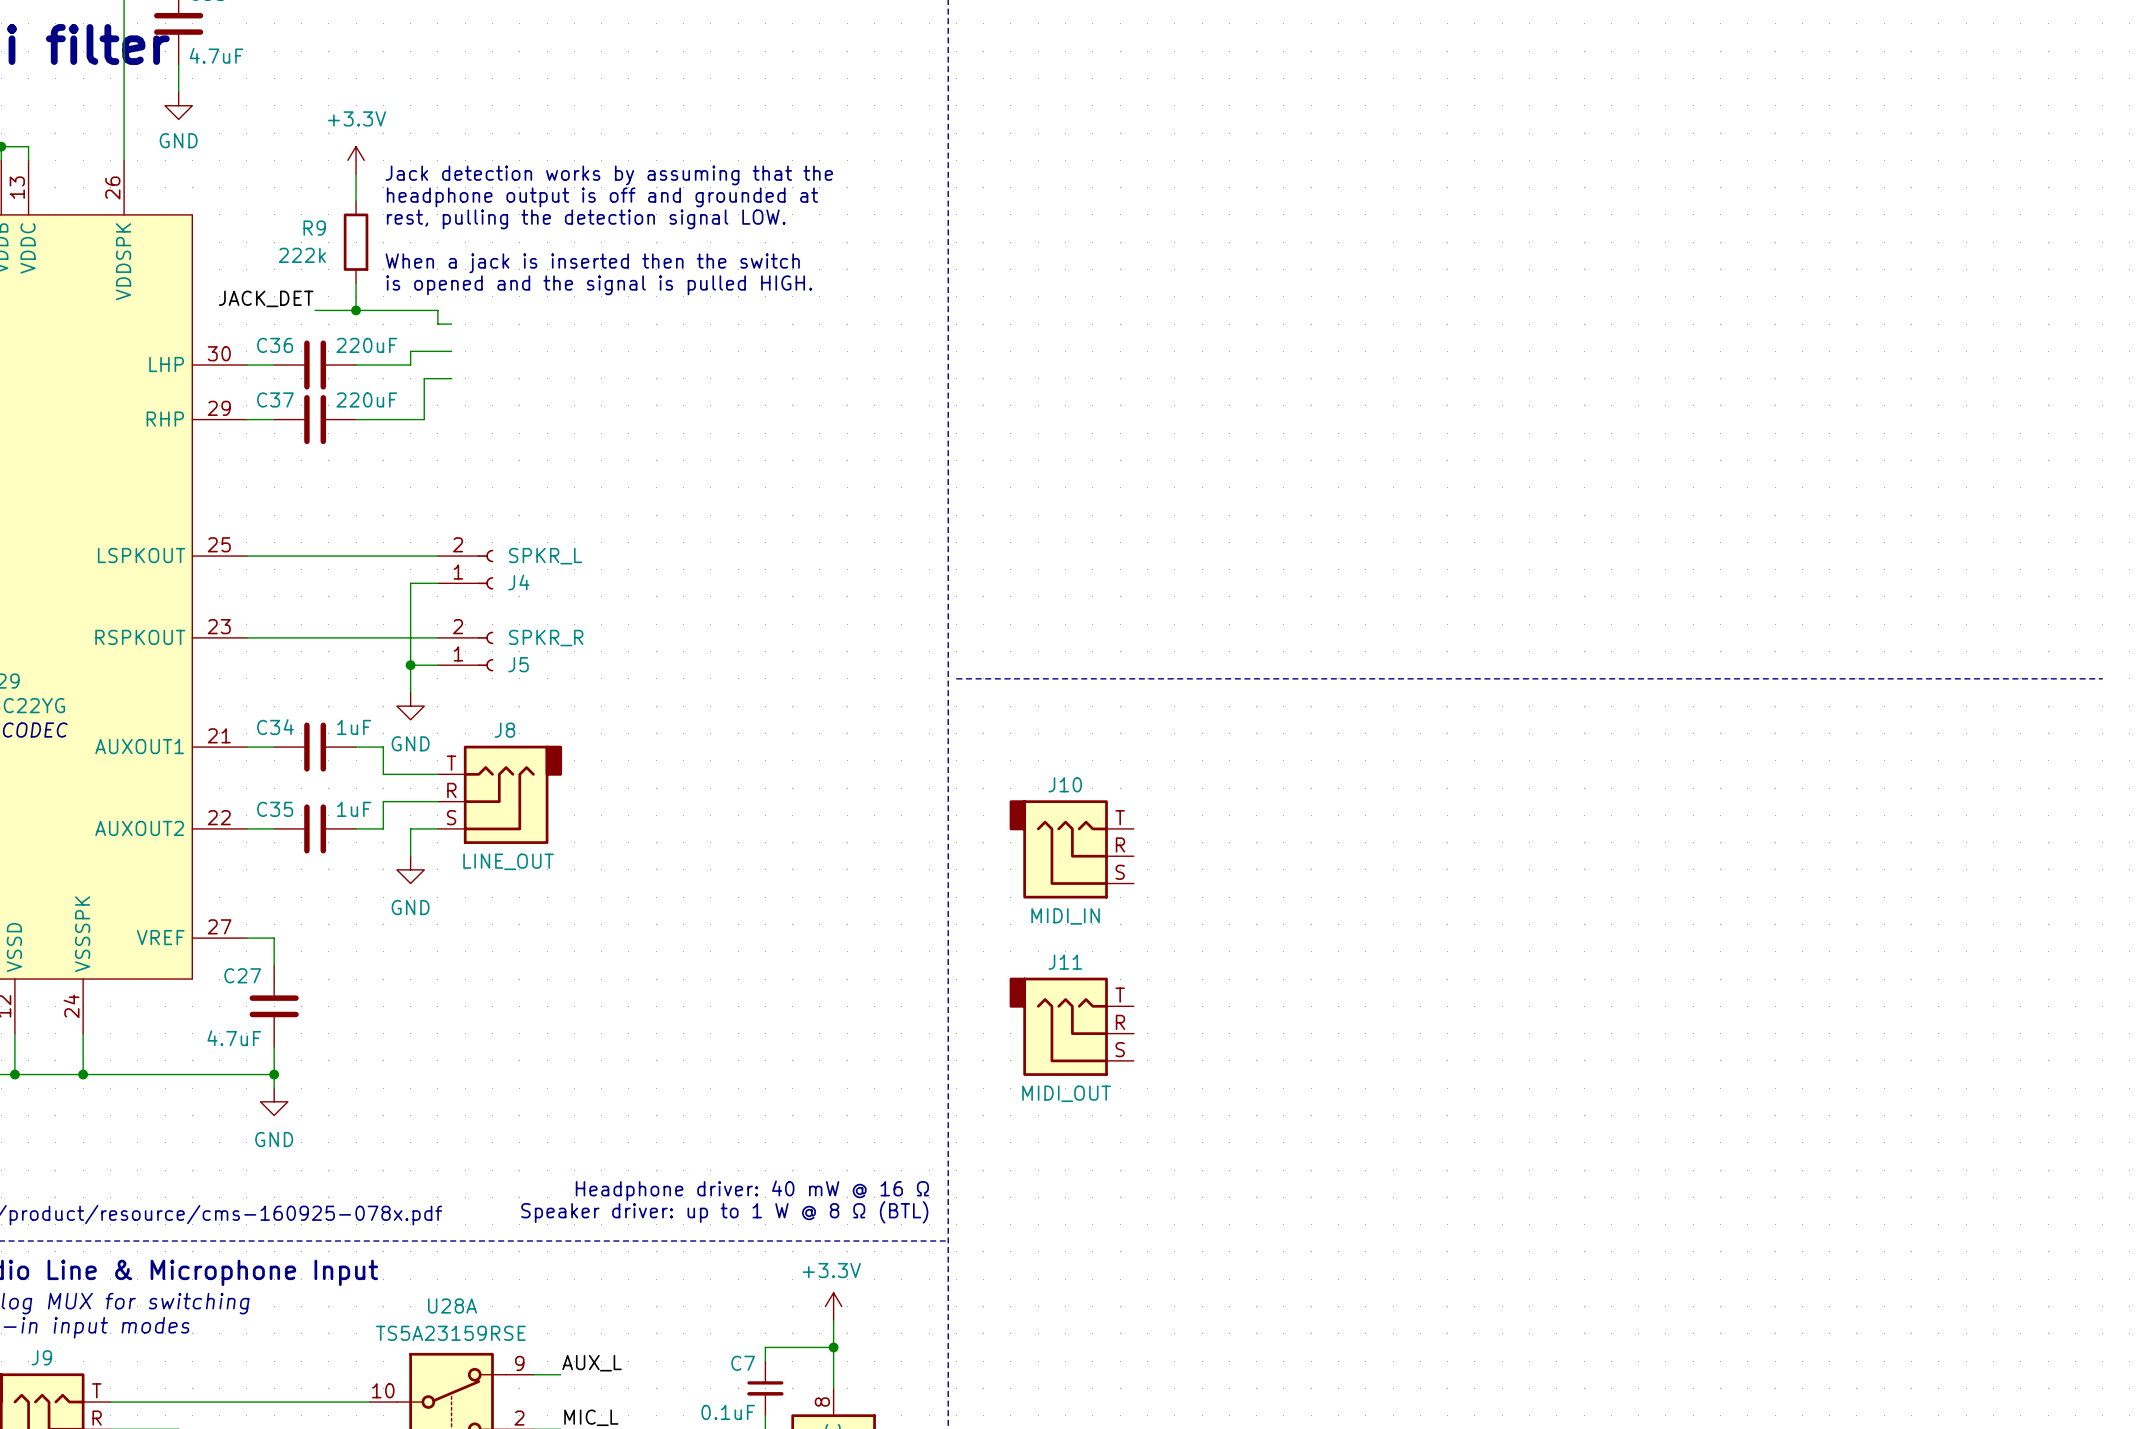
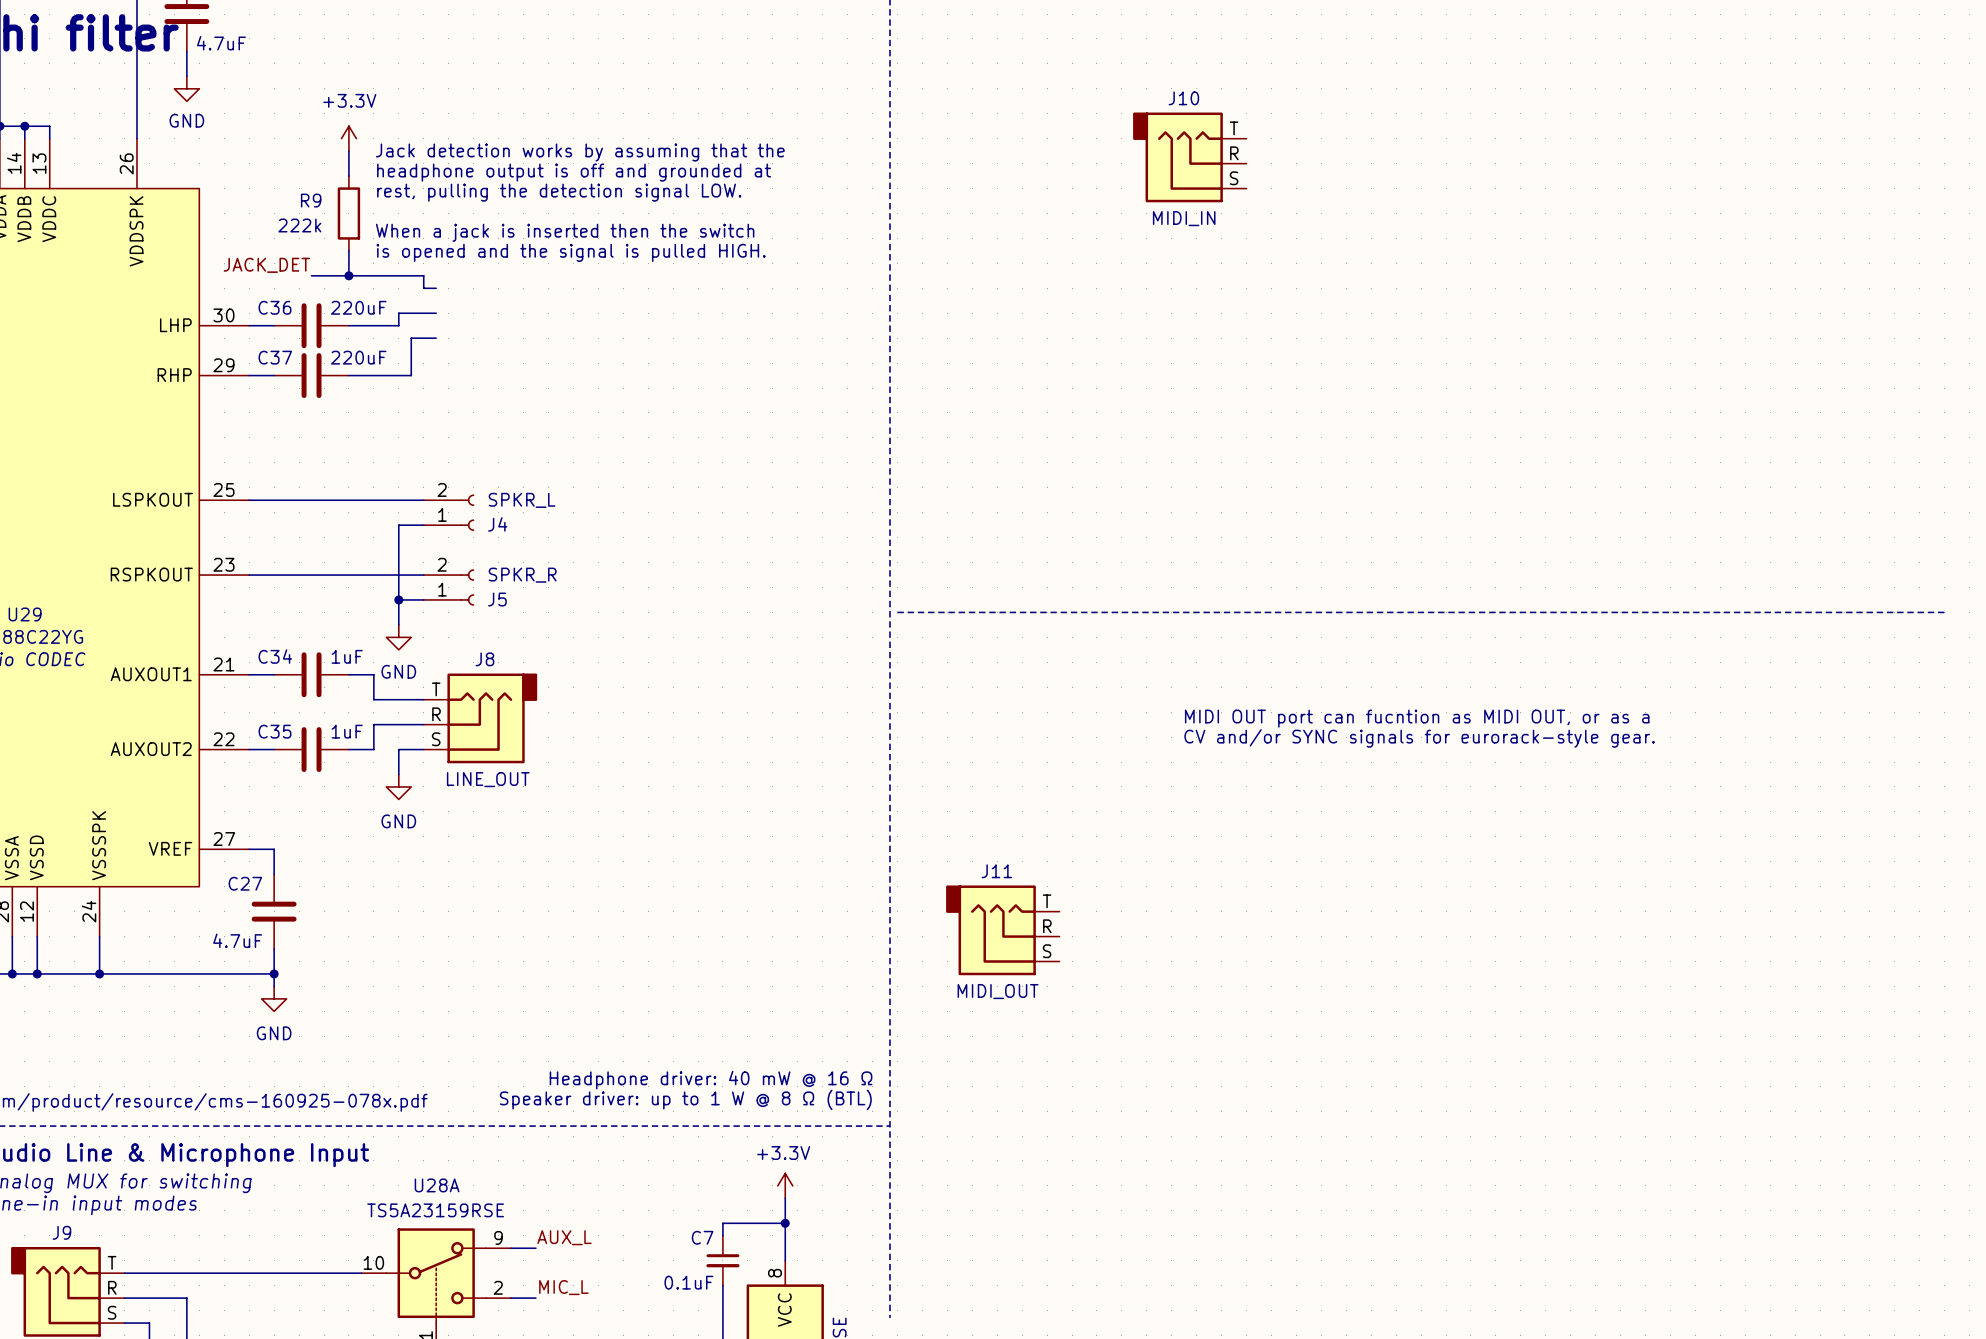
text: none -> MIDI OUT port can fucntion as MIDI OUT, or as a (1417, 718)
text: none -> CV and/or SYNC signals for eurorack-style gear. (1419, 738)
J10 position: (1071, 849) -> (1189, 157)

